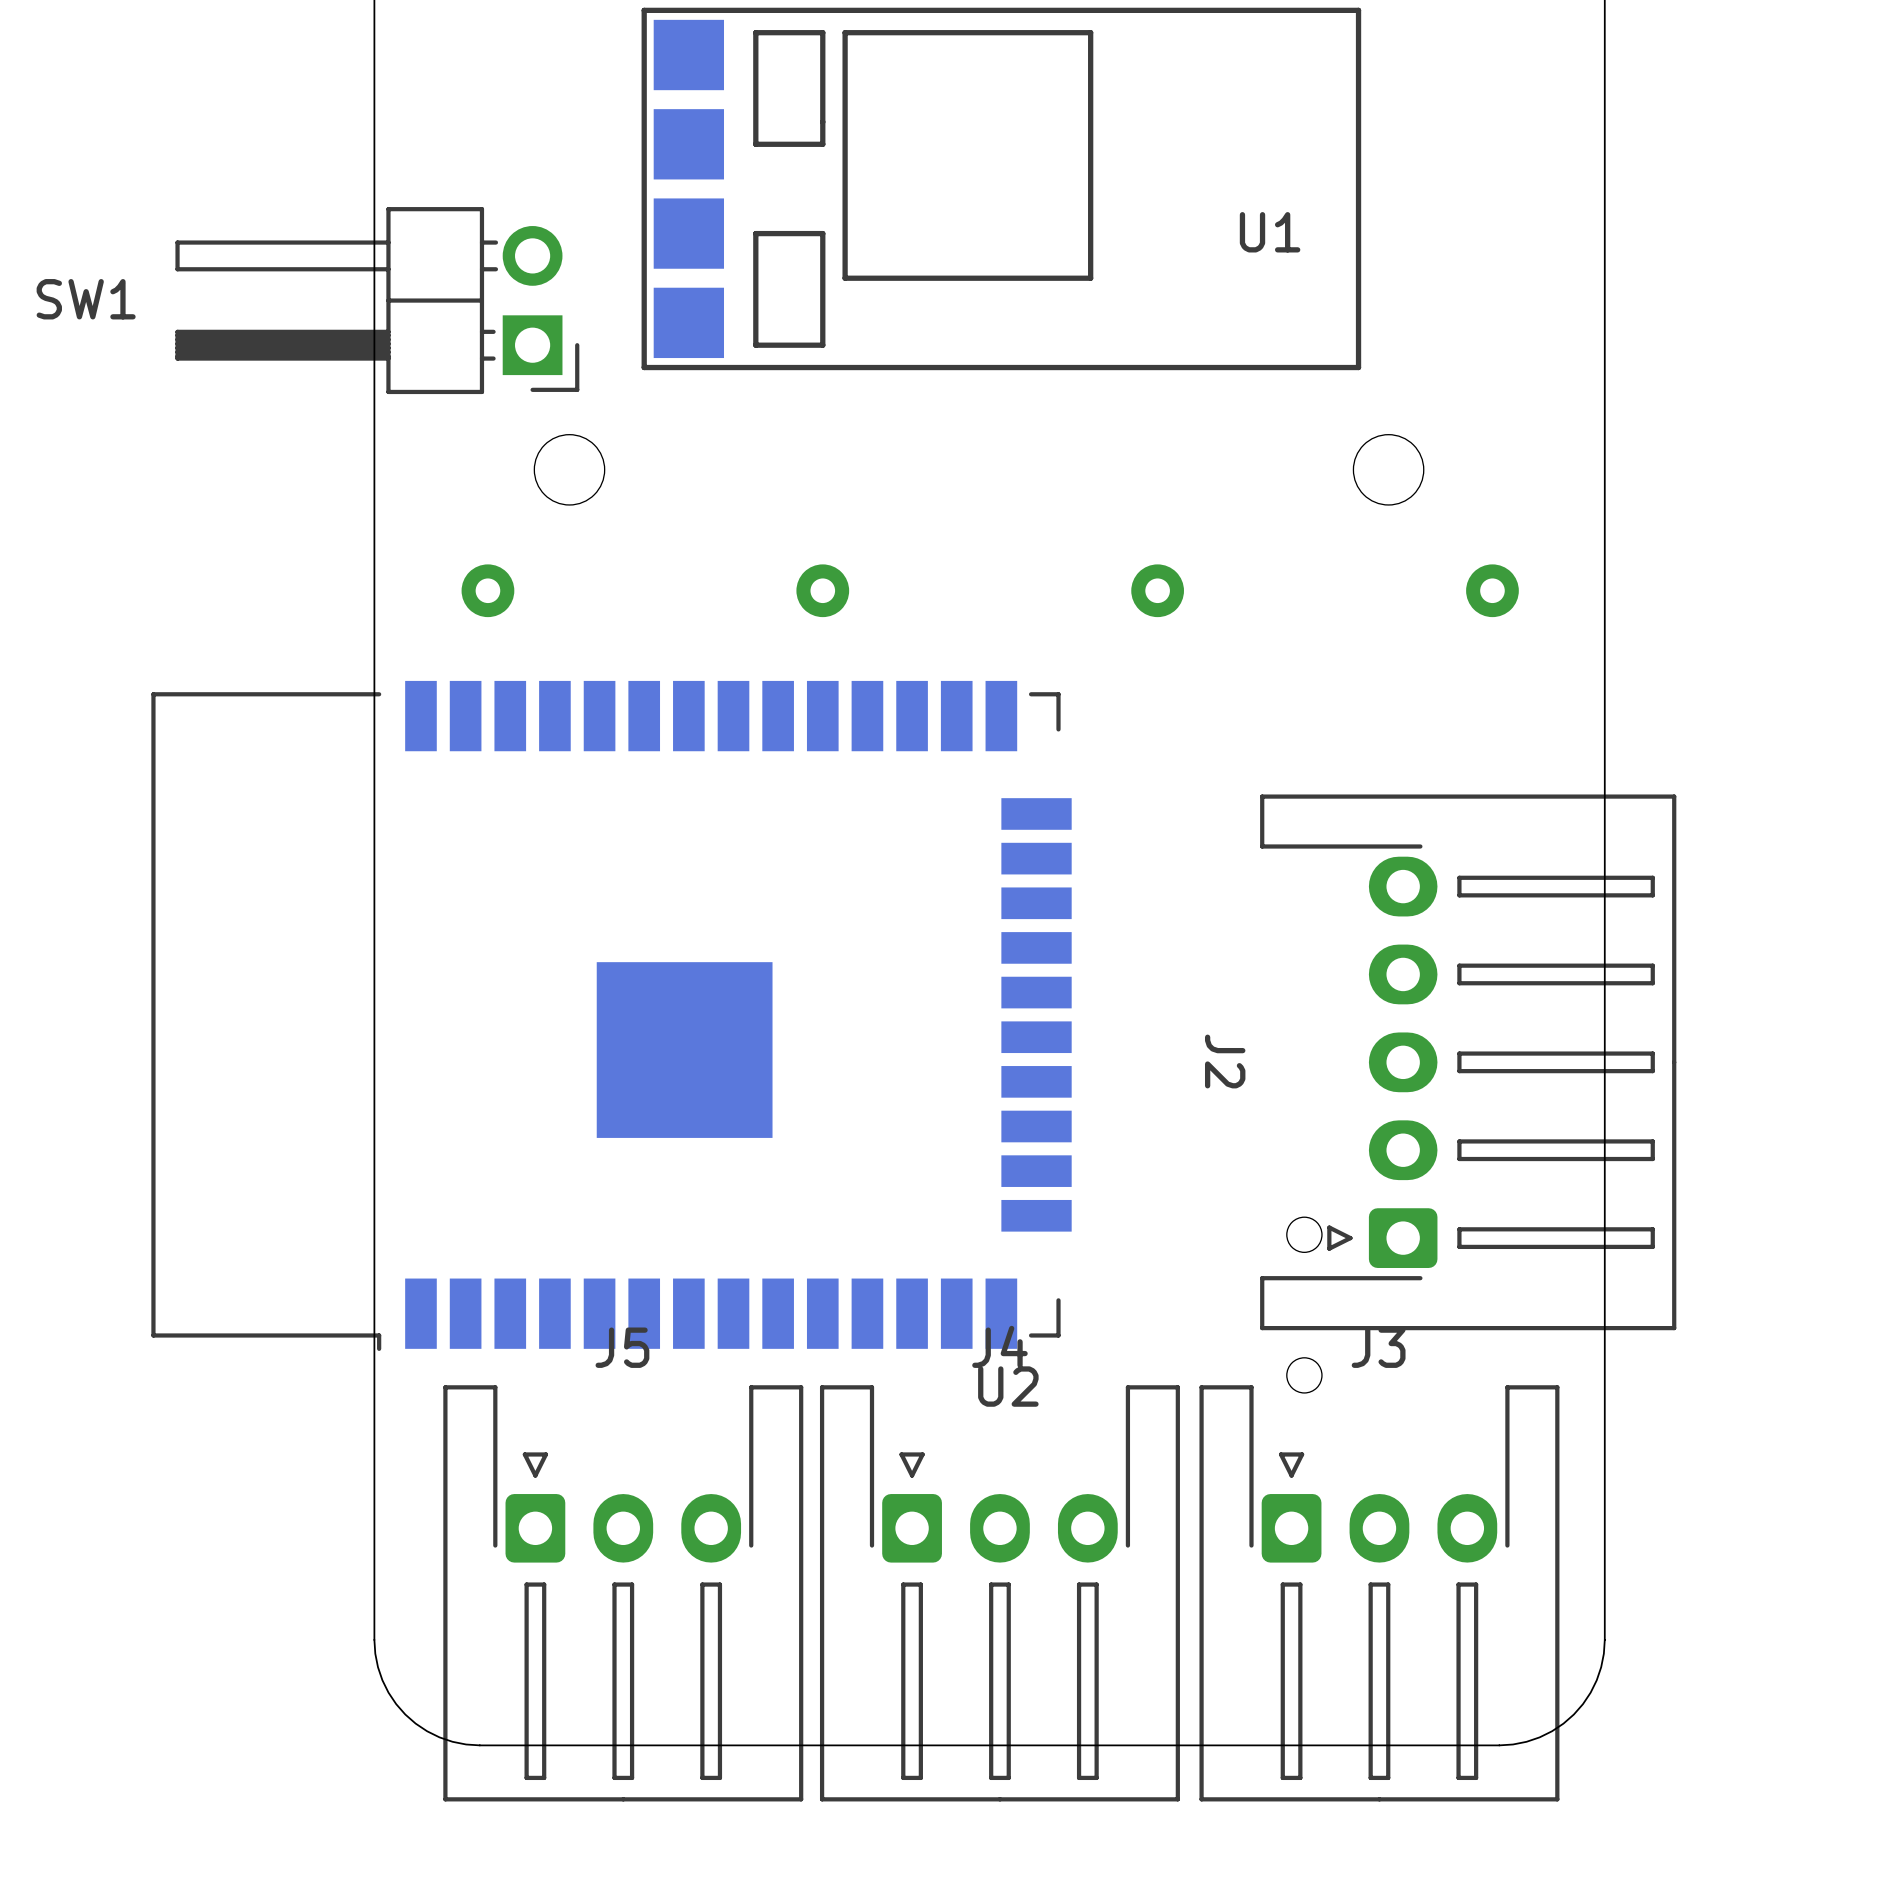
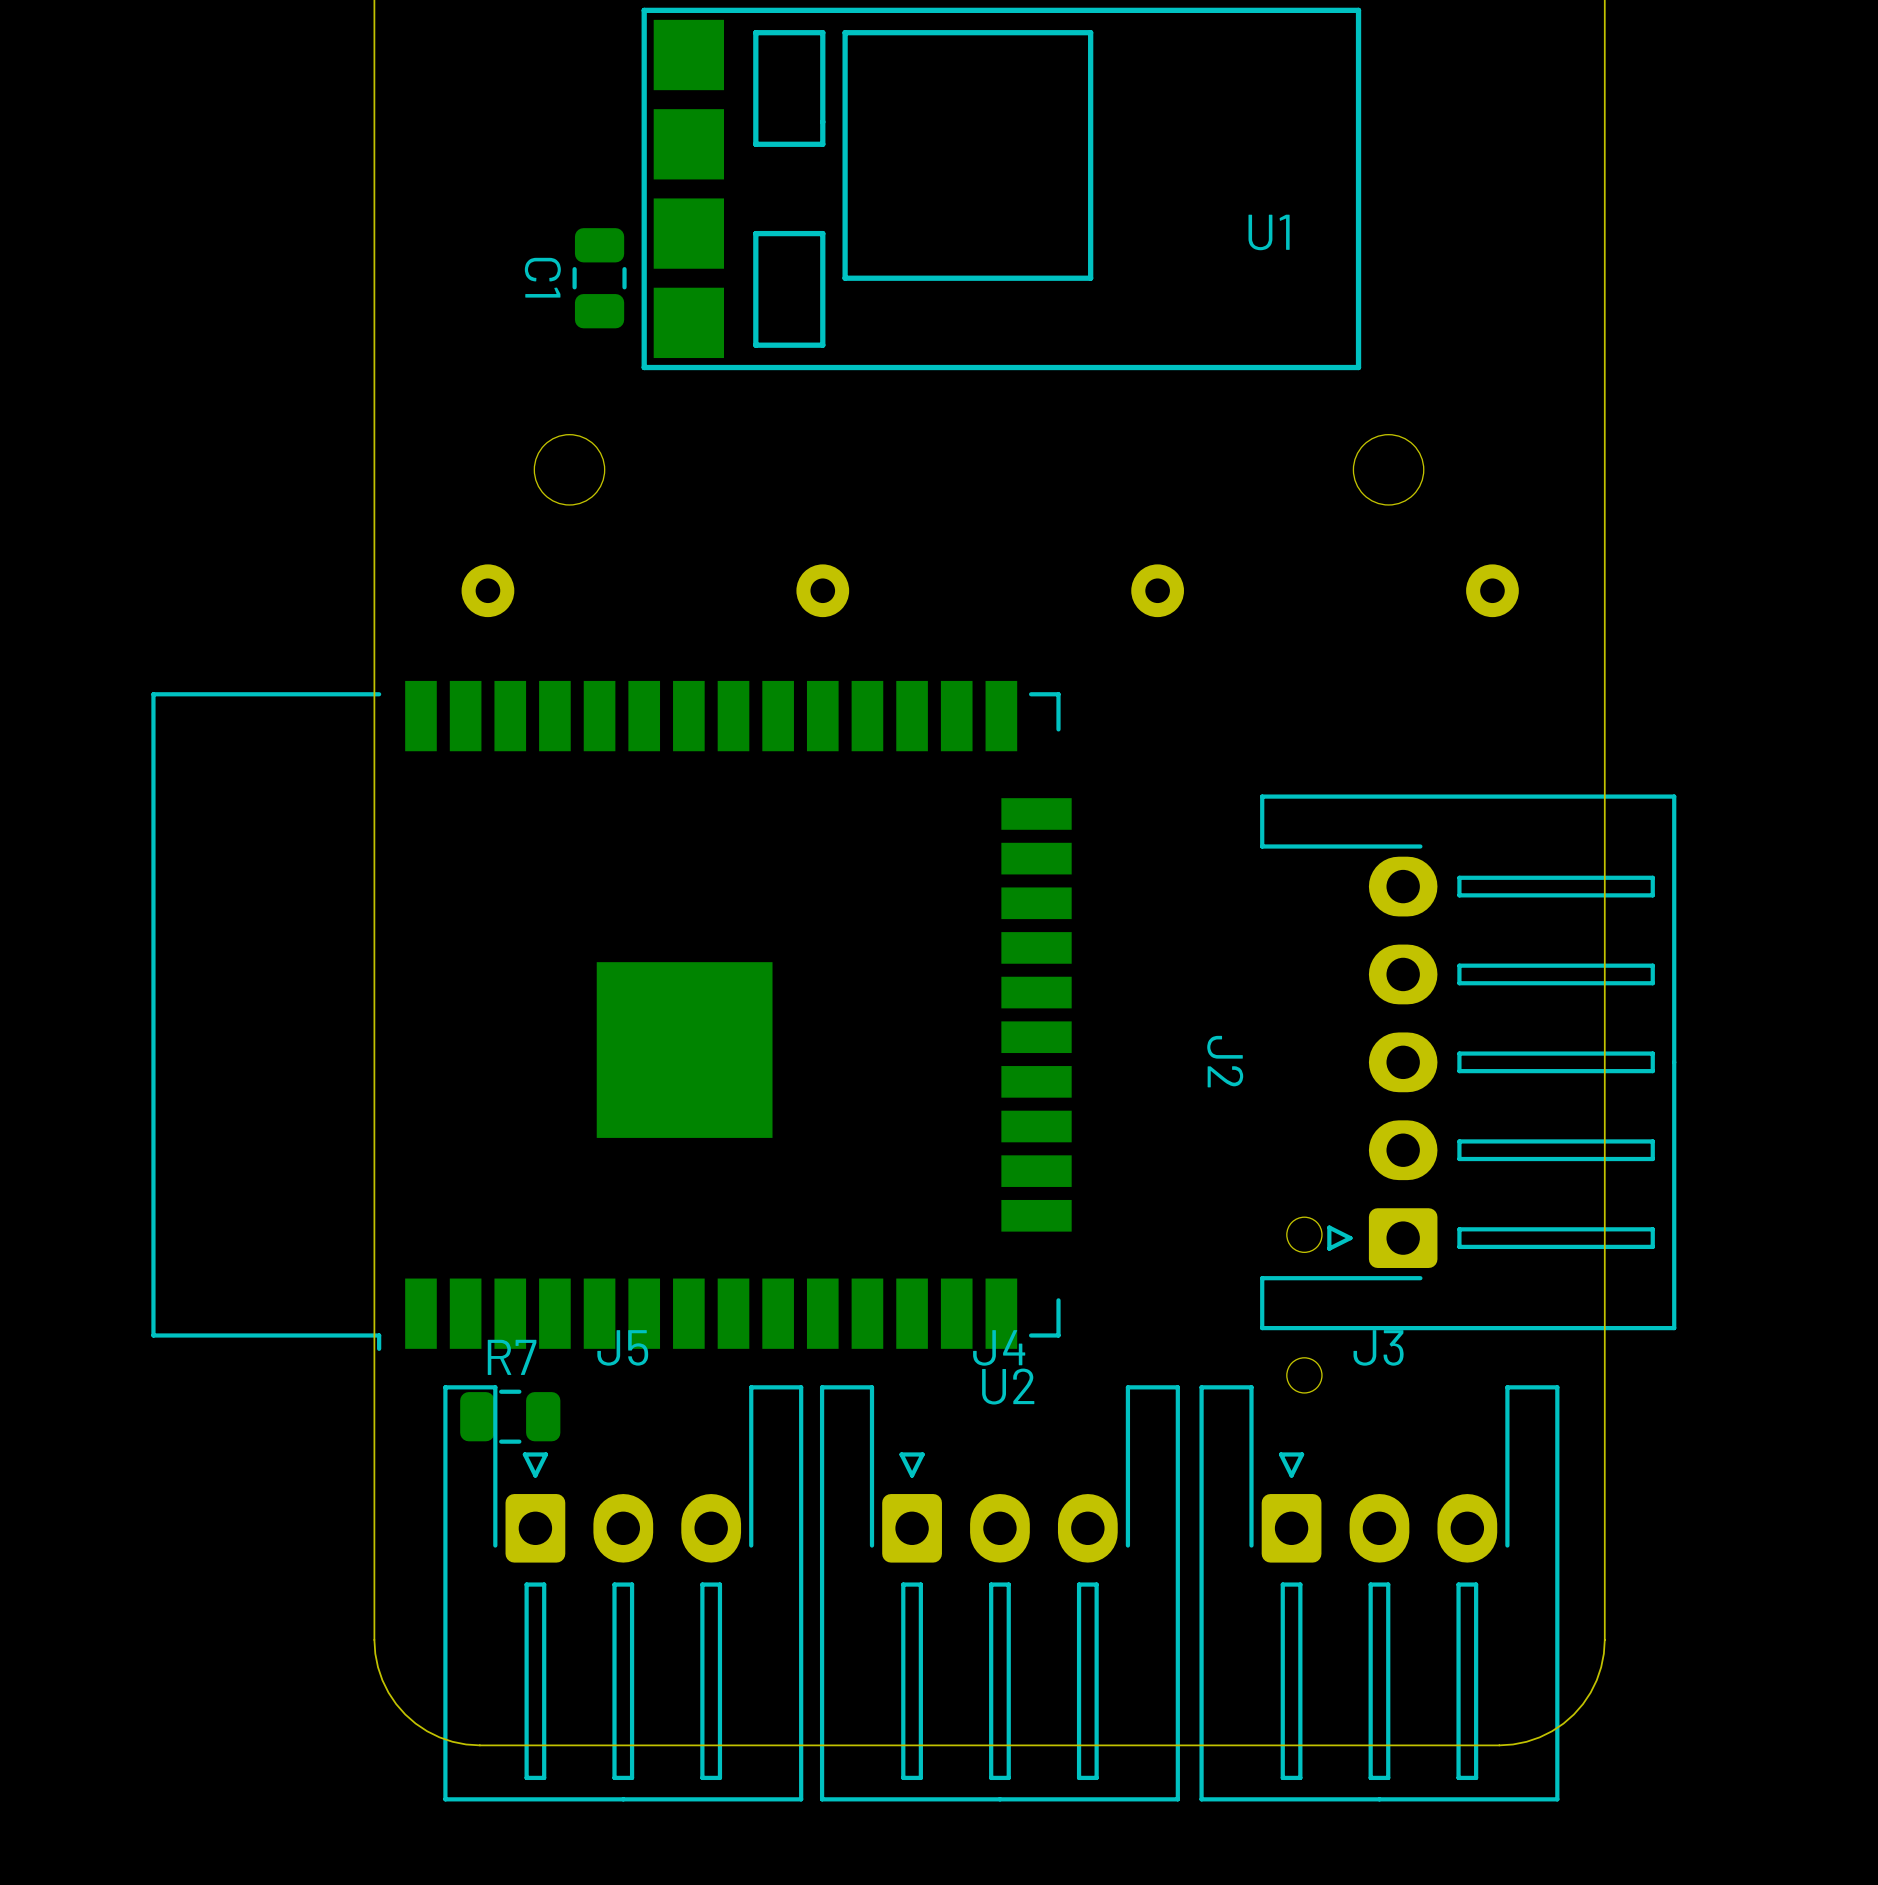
C1: none -> (599, 278)
SW1: (377, 300) -> none
R7: none -> (510, 1416)

